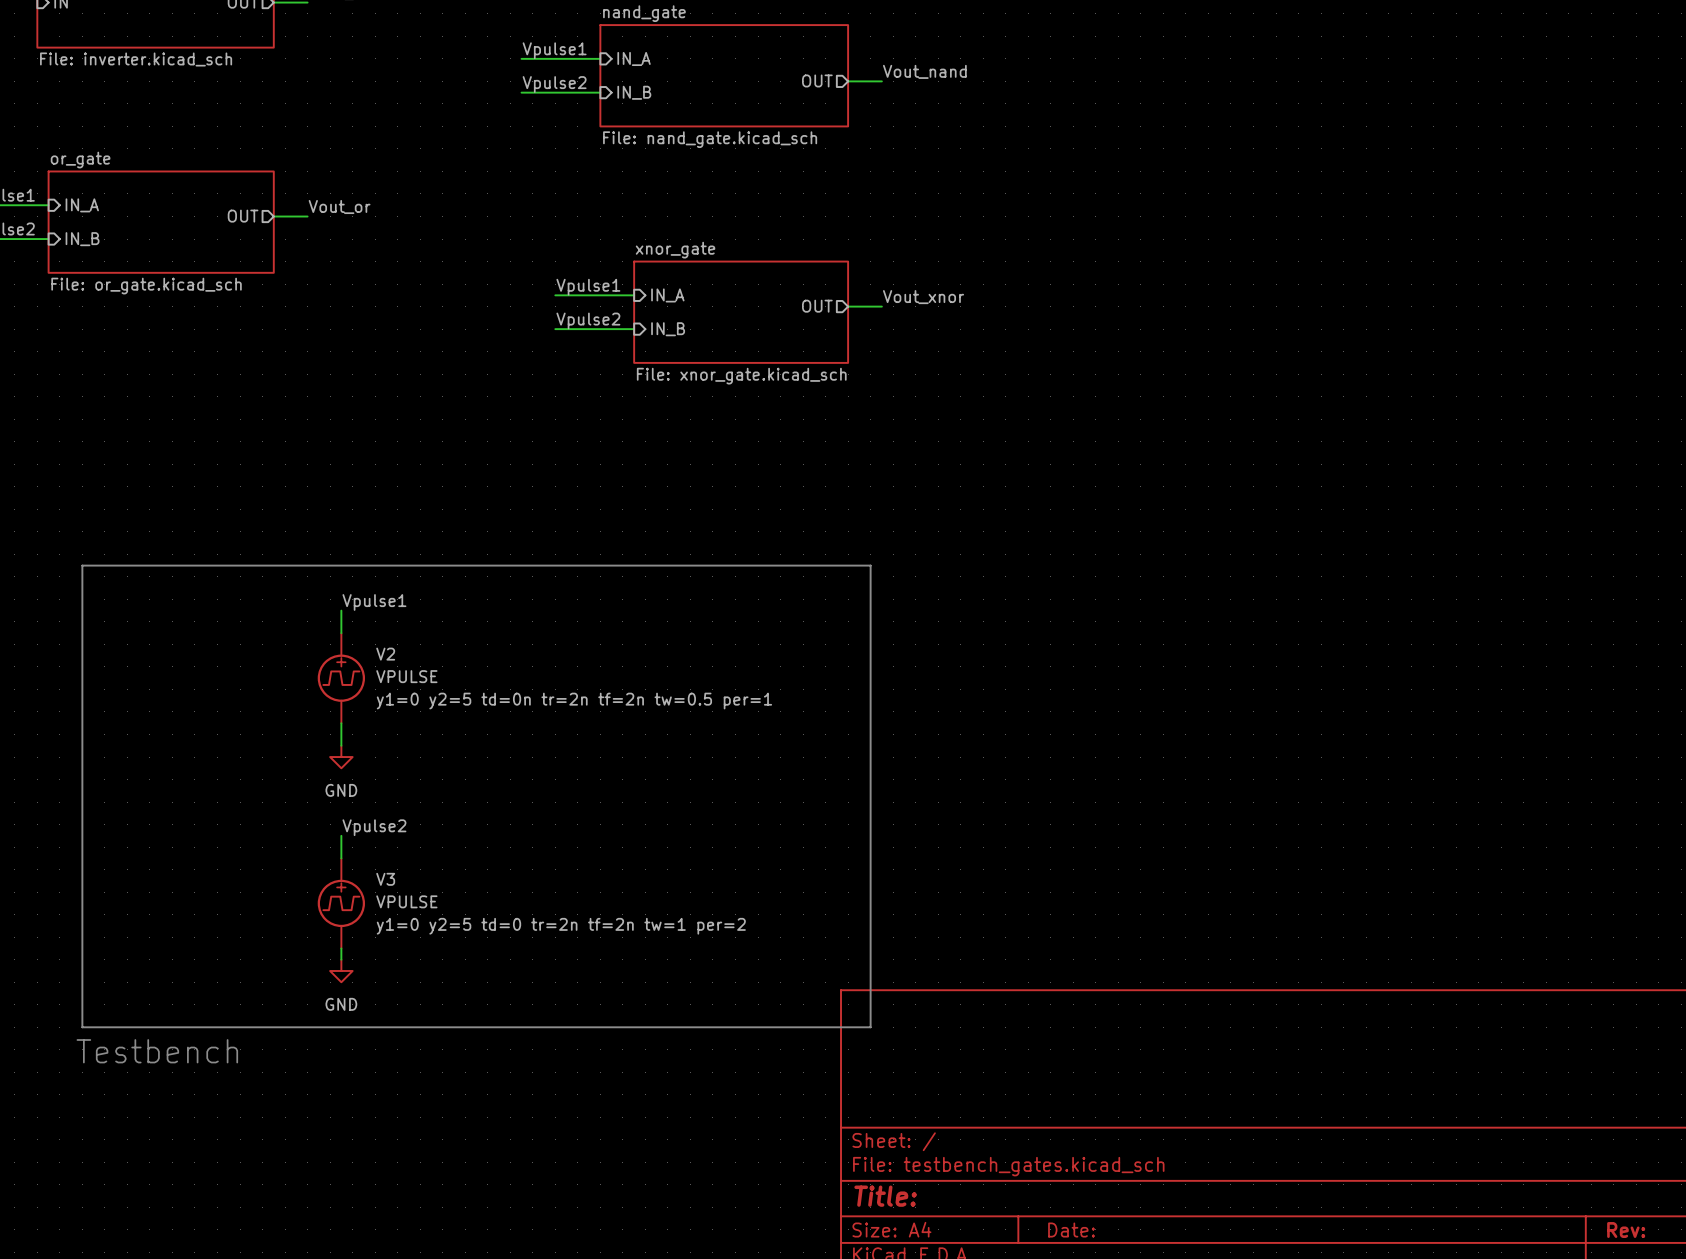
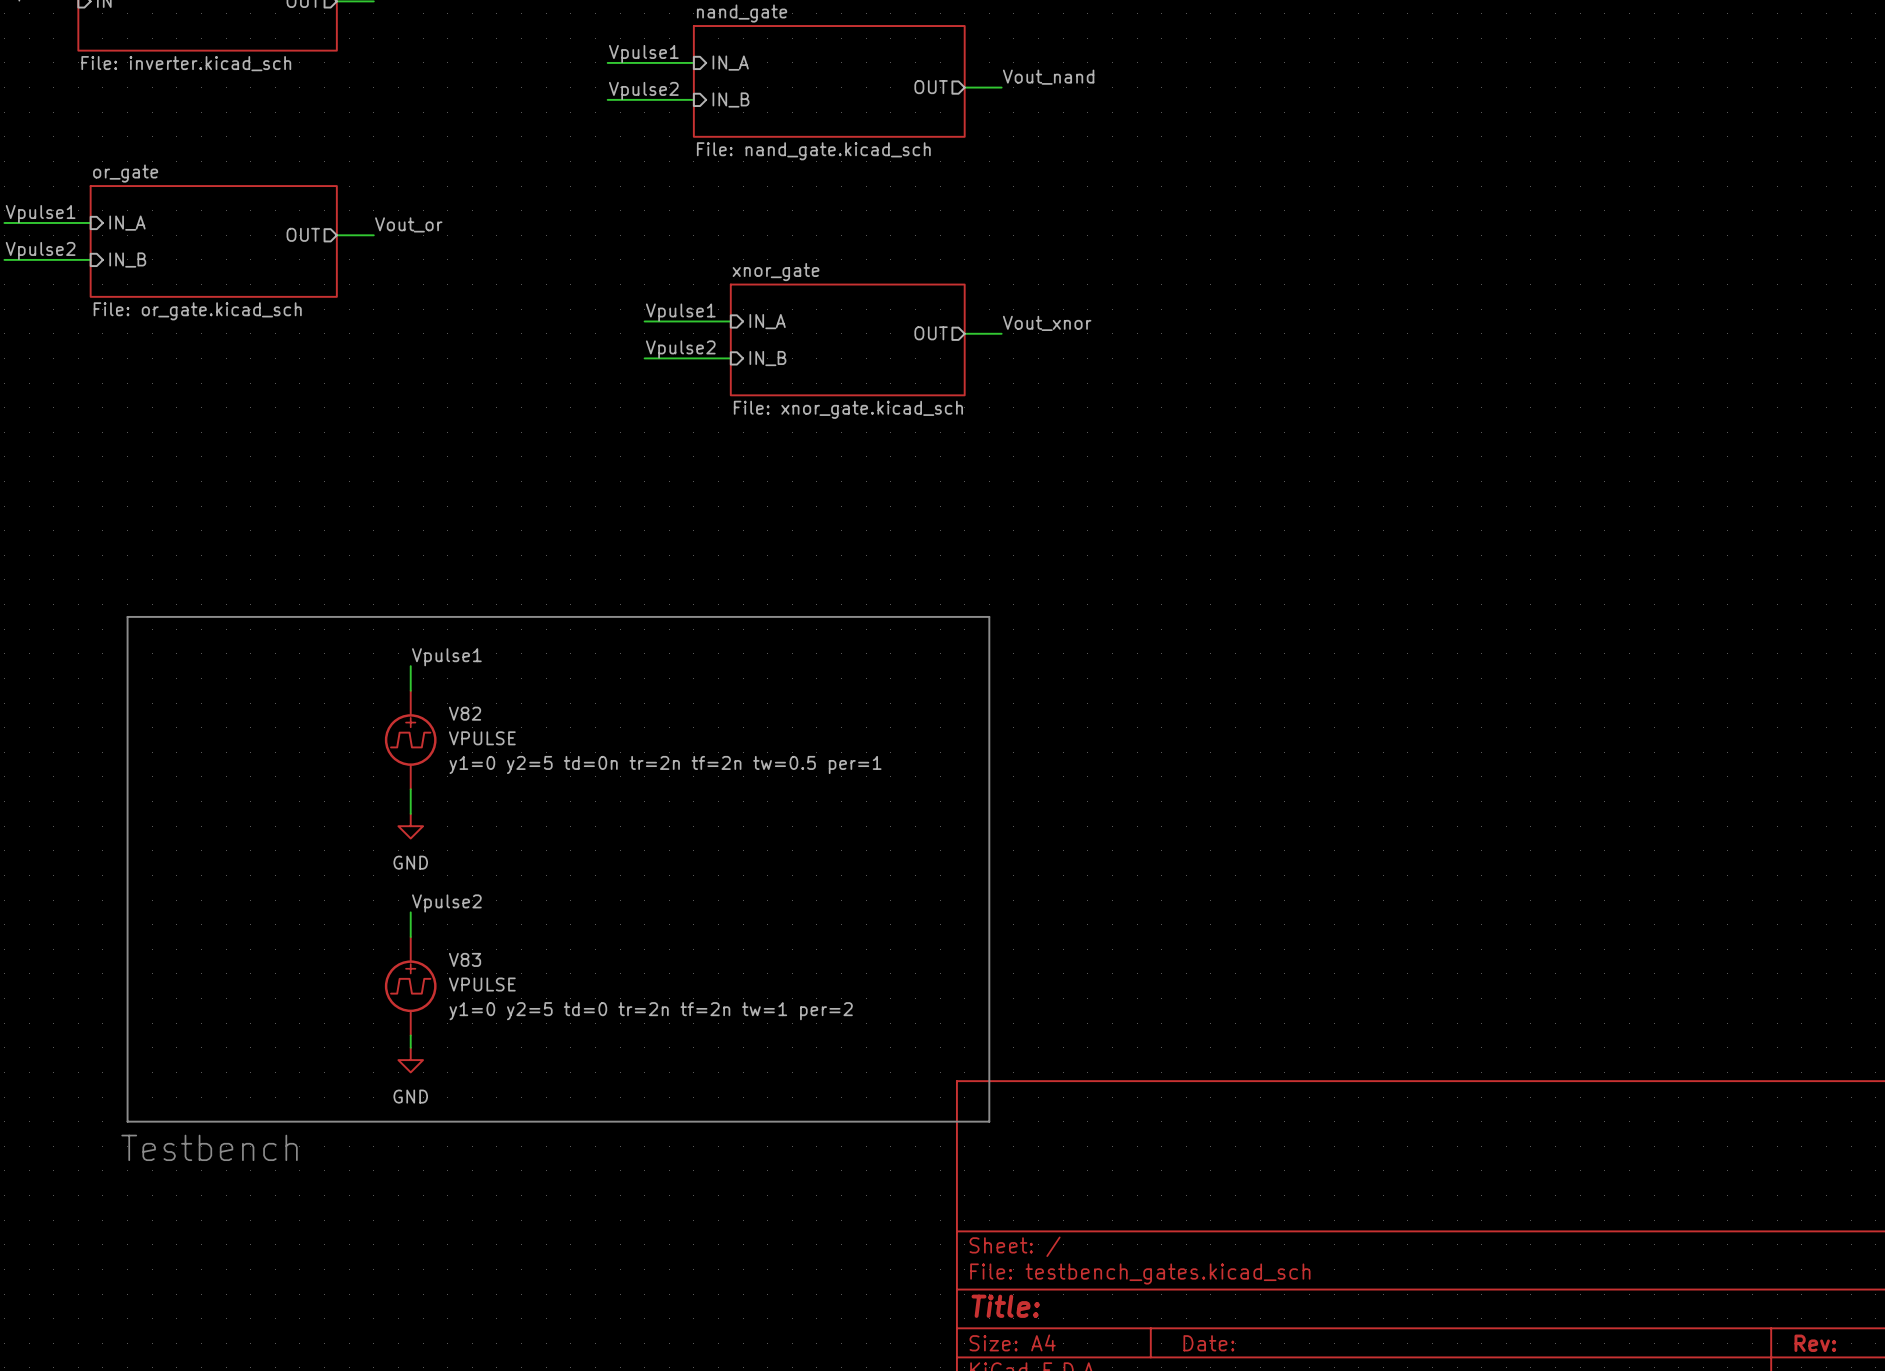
V2 name: V2 (385, 654) -> V82 (465, 713)
V3 name: V3 (385, 879) -> V83 (465, 959)

